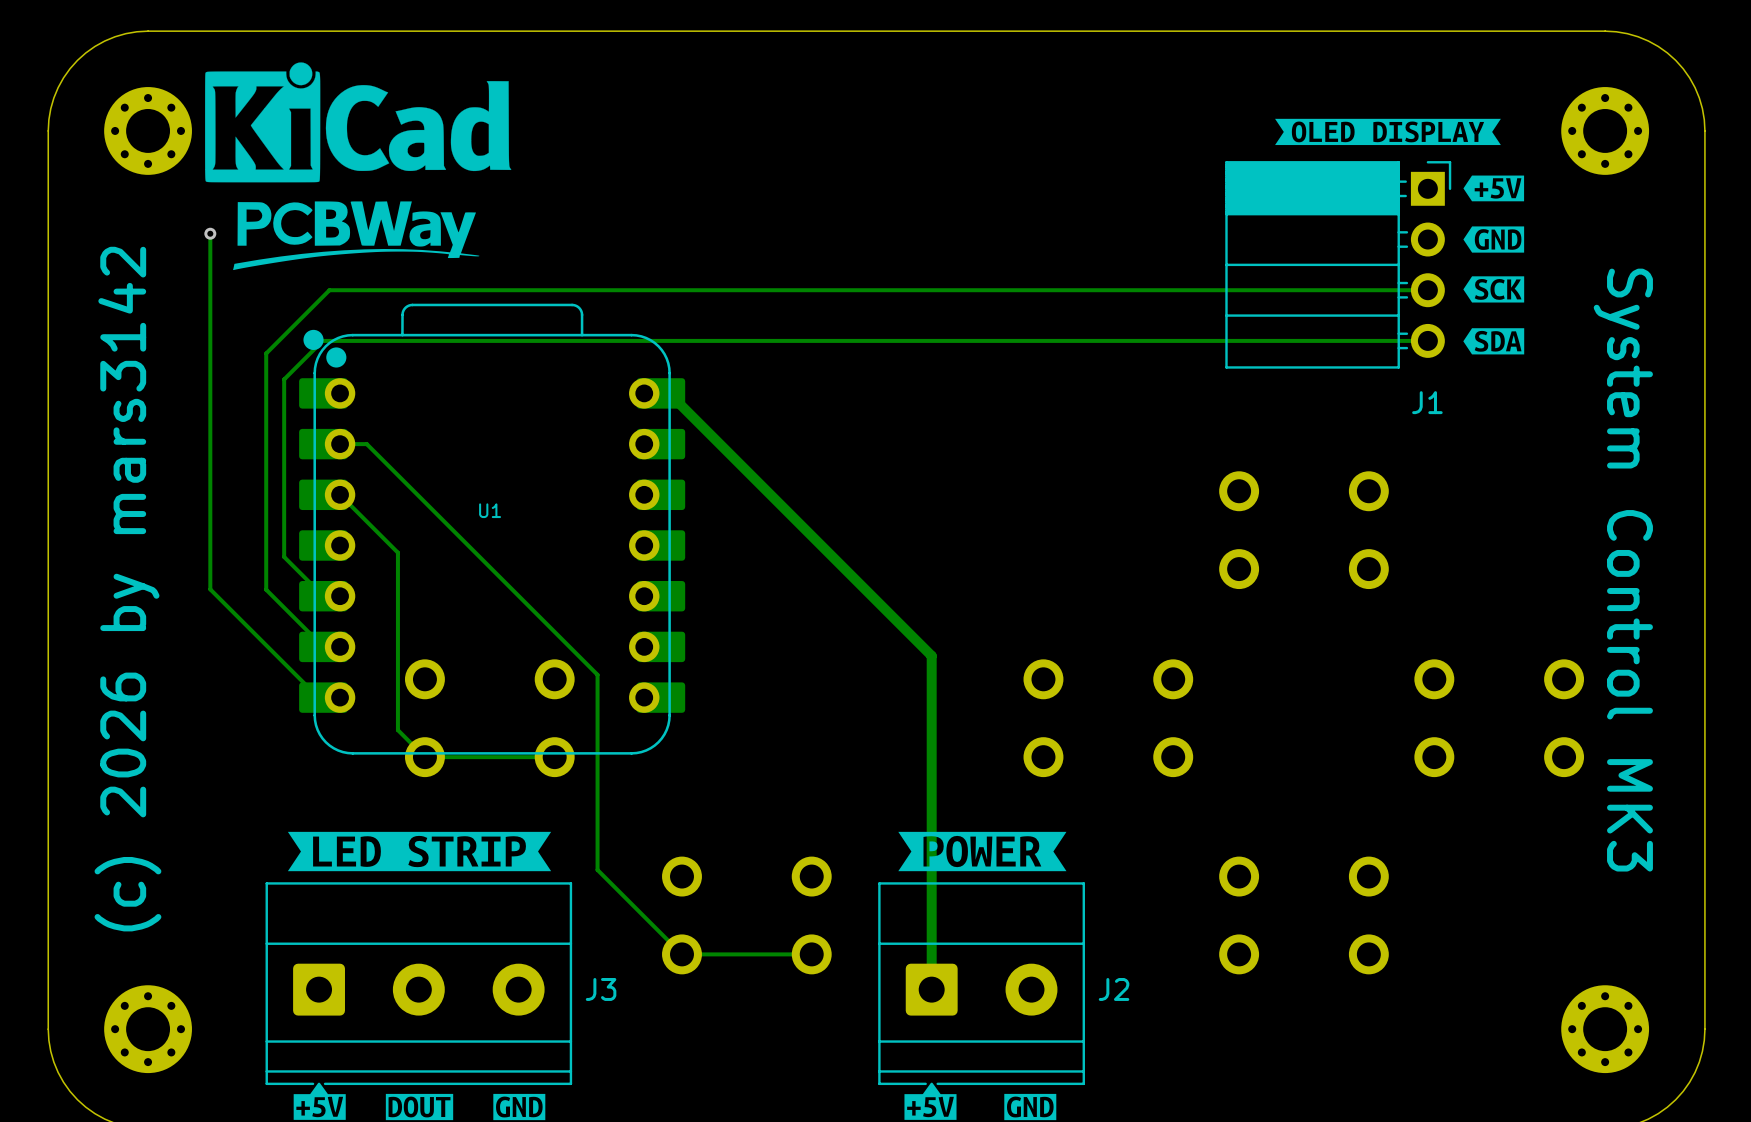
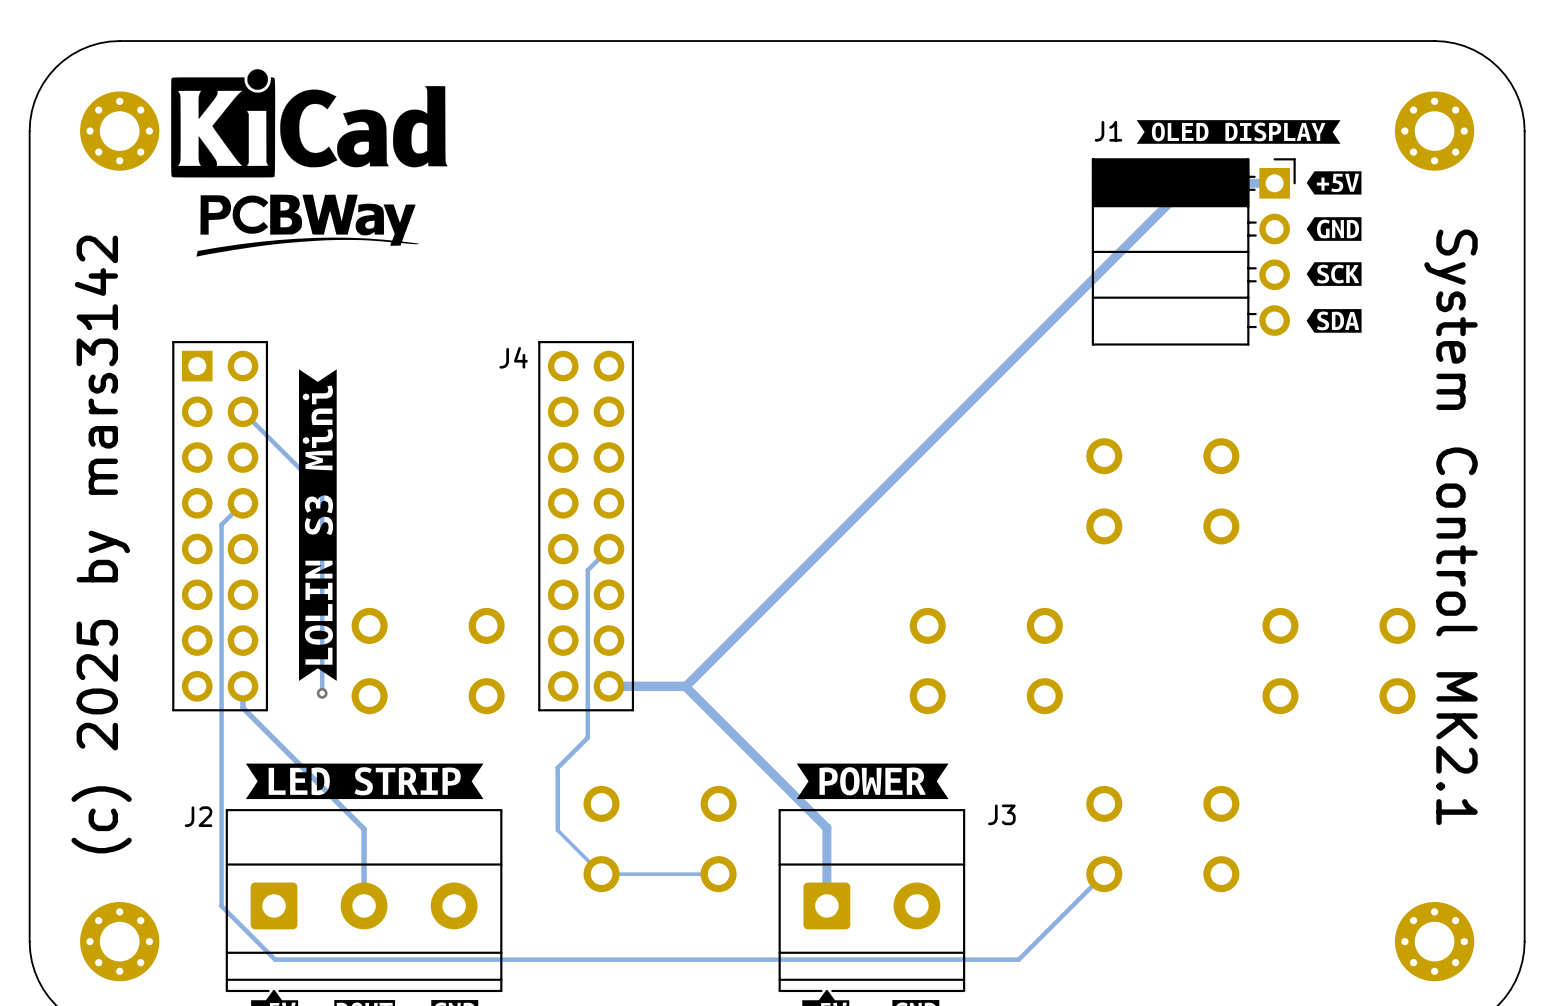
track: none -> (1274, 183) (1189, 183) (686, 686) (608, 686)
track: (210, 233) (210, 589) (318, 697) (340, 697) -> none
via: (210, 233) -> none
track: (1427, 290) (329, 290) (266, 353) (266, 589) (323, 646) -> none
track: (1427, 340) (322, 340) (284, 379) (284, 556) (323, 596) -> none
track: (644, 393) (669, 393) (931, 655) (931, 903) -> (685, 686) (826, 827)
drawing: none -> [299, 369, 337, 681]
J1 name position: J1 (1427, 402) -> J1 (1108, 131)
track: none -> (242, 411) (322, 491) (322, 693)
track: (340, 444) (366, 444) (597, 674) (597, 869) (633, 905) -> (608, 549) (587, 570) (587, 737) (557, 767) (557, 830)
track: (340, 494) (397, 552) (397, 730) (424, 757) (554, 757) -> none
U1: (492, 529) -> none
track: none -> (242, 503) (221, 524) (221, 906) (275, 959) (1018, 959) (1104, 874)
J4: none -> (403, 526)
text: System Control MK3 (1623, 570) -> System Control MK2.1 (1451, 527)
text: (c) 2026 by mars3142 (127, 589) -> (c) 2025 by mars3142 (101, 544)
track: none -> (242, 686) (242, 707) (364, 829) (364, 905)
via: none -> (322, 693)
J3 name: J3 (601, 989) -> J2 (198, 816)
J2 name: J2 (1114, 989) -> J3 (1001, 814)

